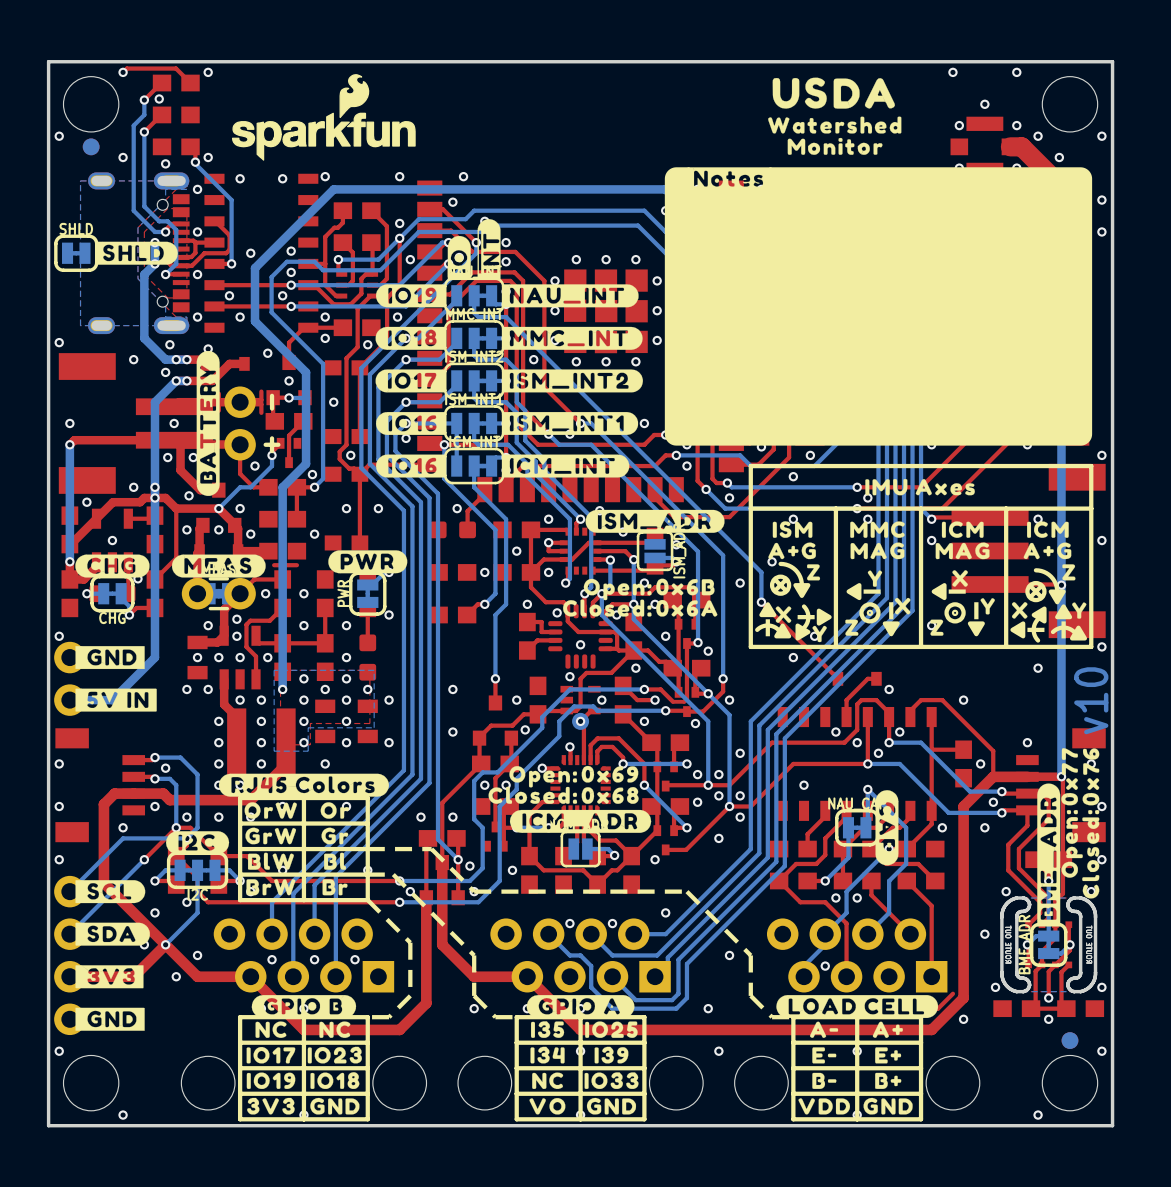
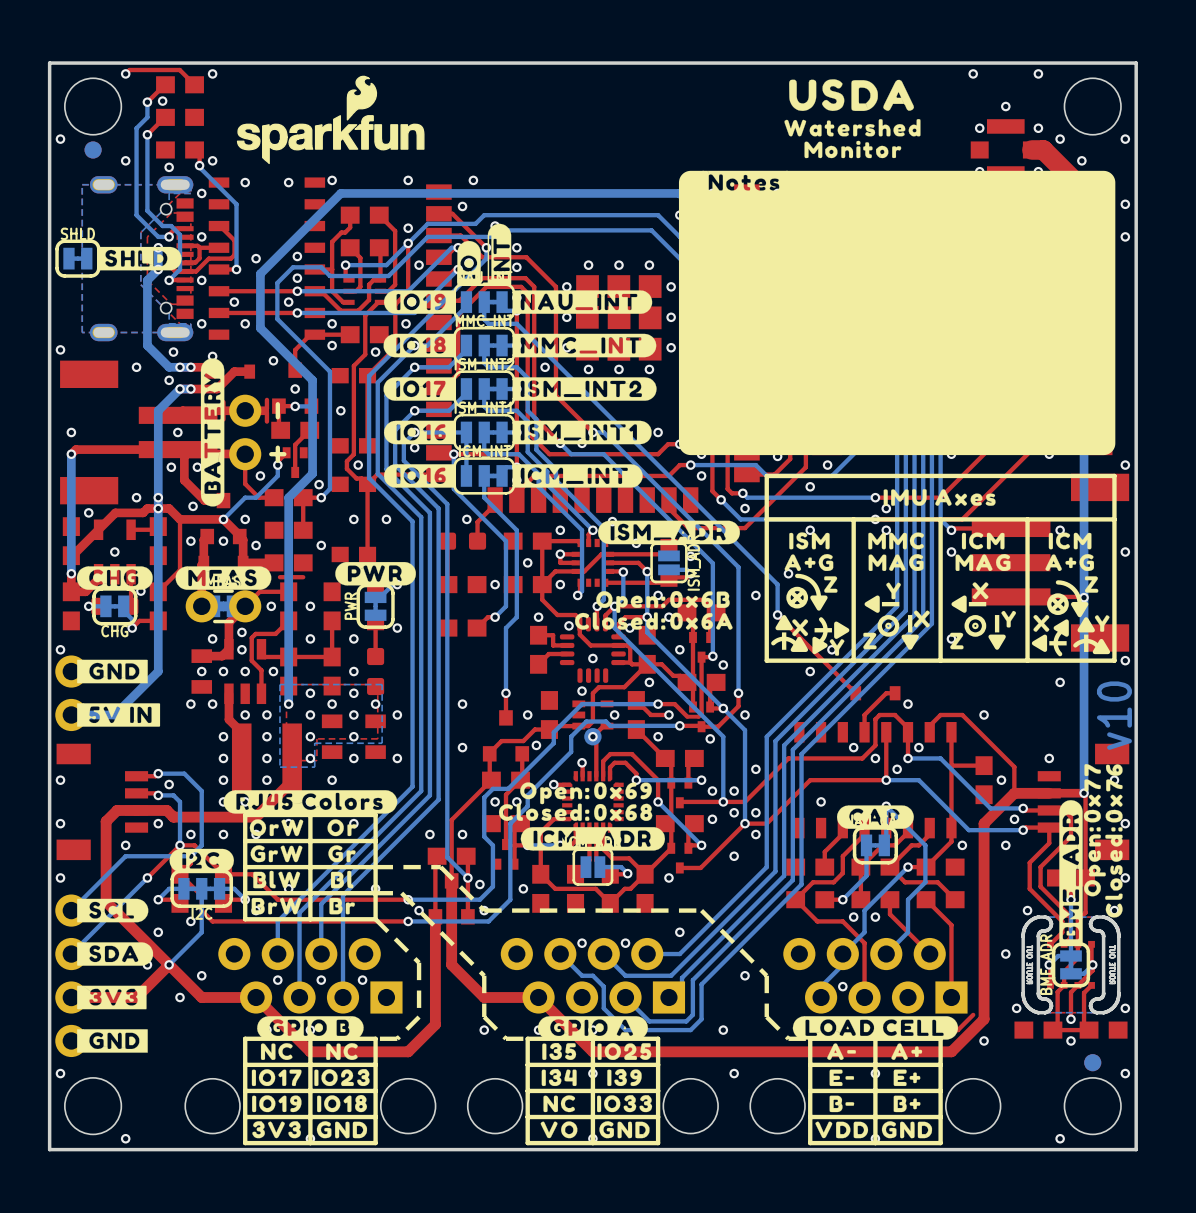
drawing: none -> [837, 805, 914, 829]
drawing: [875, 790, 899, 866] -> none

